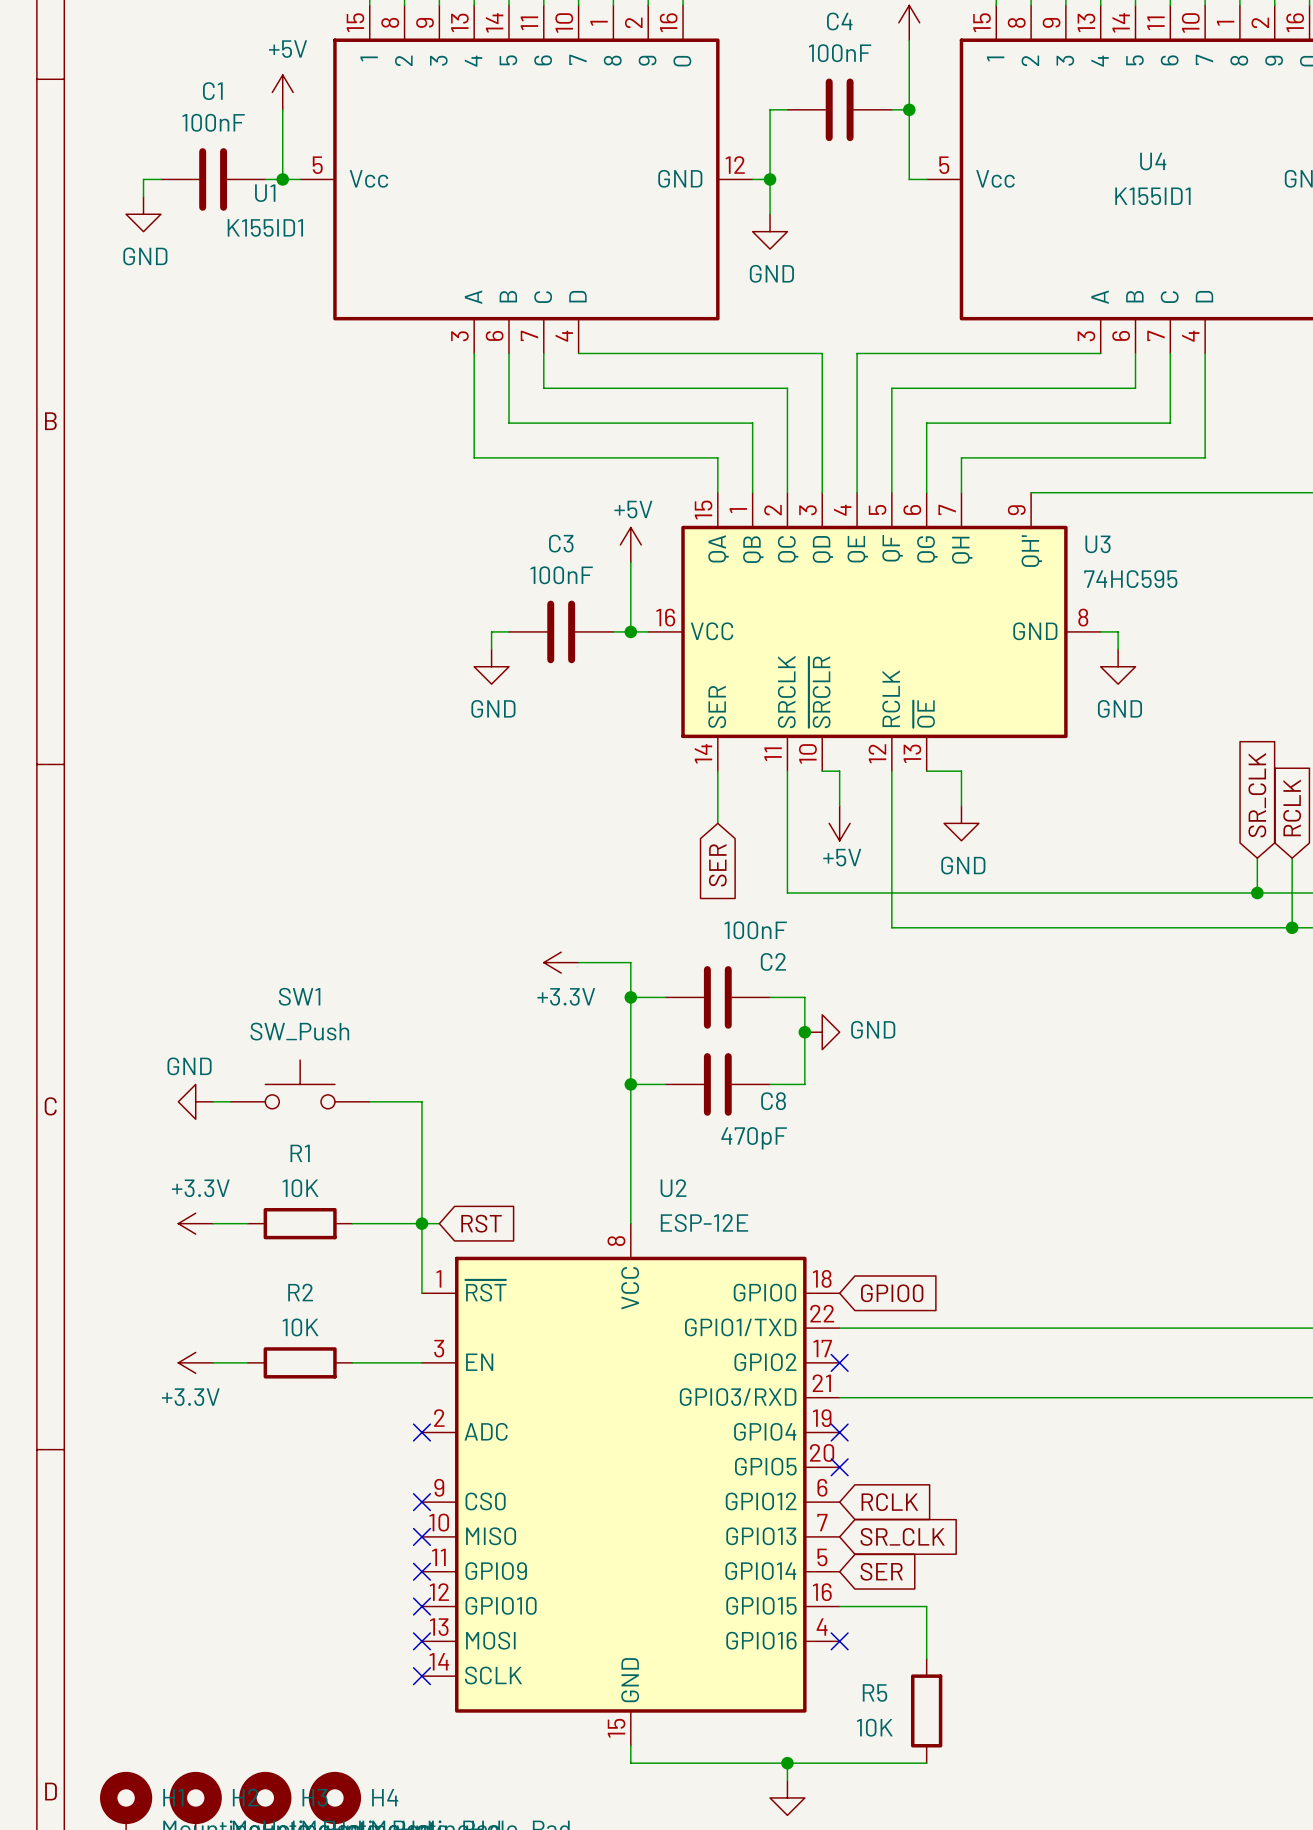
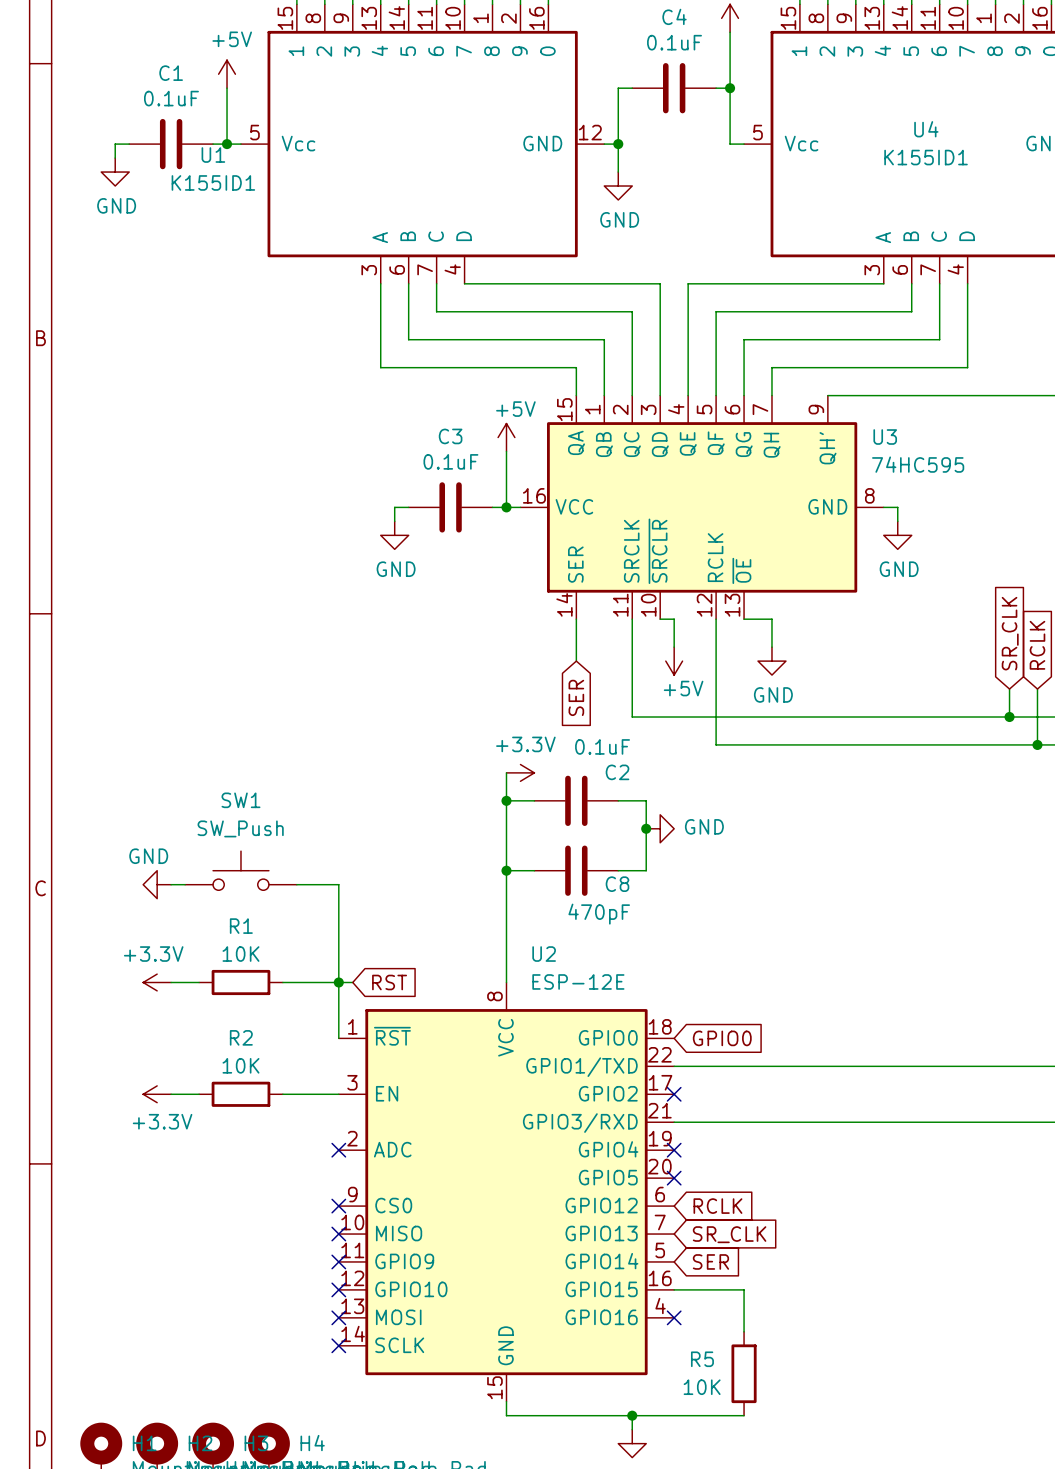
C4 value: 100nF (840, 53) -> 0.1uF (674, 42)
C1 value: 100nF (213, 122) -> 0.1uF (171, 98)
C3 value: 100nF (561, 575) -> 0.1uF (450, 461)
C2 value: 100nF (755, 930) -> 0.1uF (602, 746)
power symbol rotation: 0° (561, 962) -> 180° (520, 772)
power symbol position: +3.3V (561, 962) -> +3.3V (520, 772)
wire: (578, 962) (630, 962) -> none

